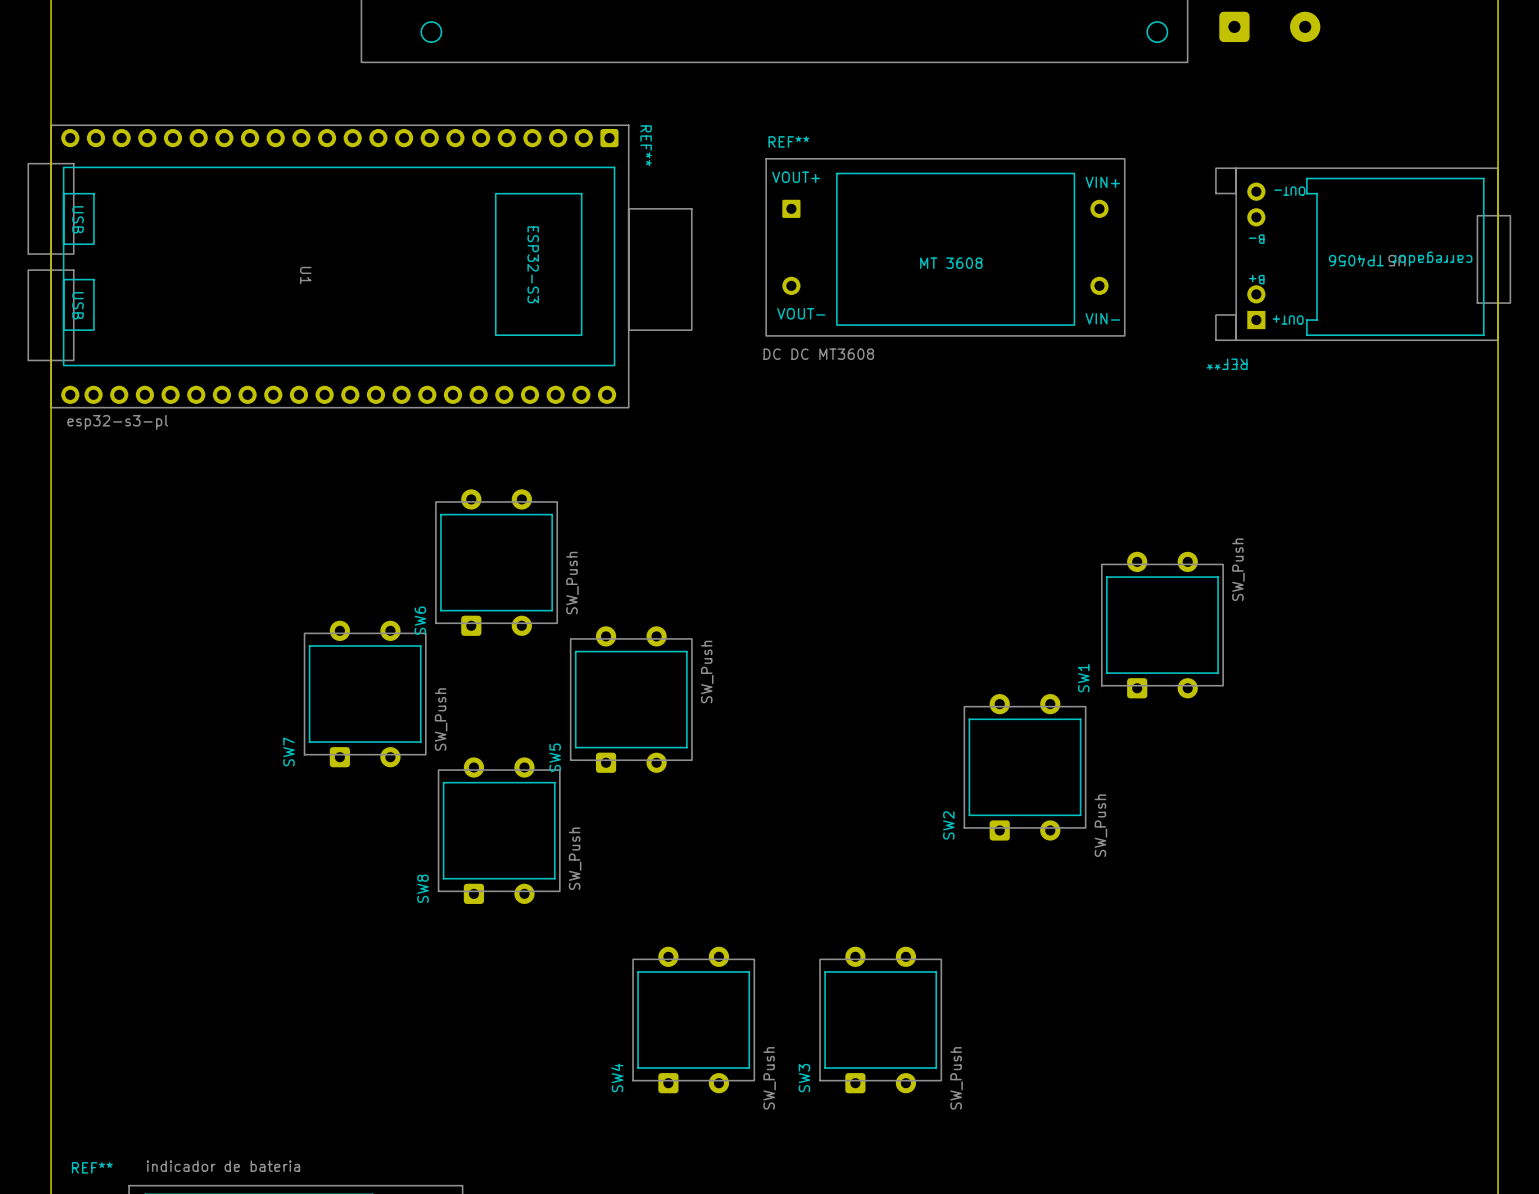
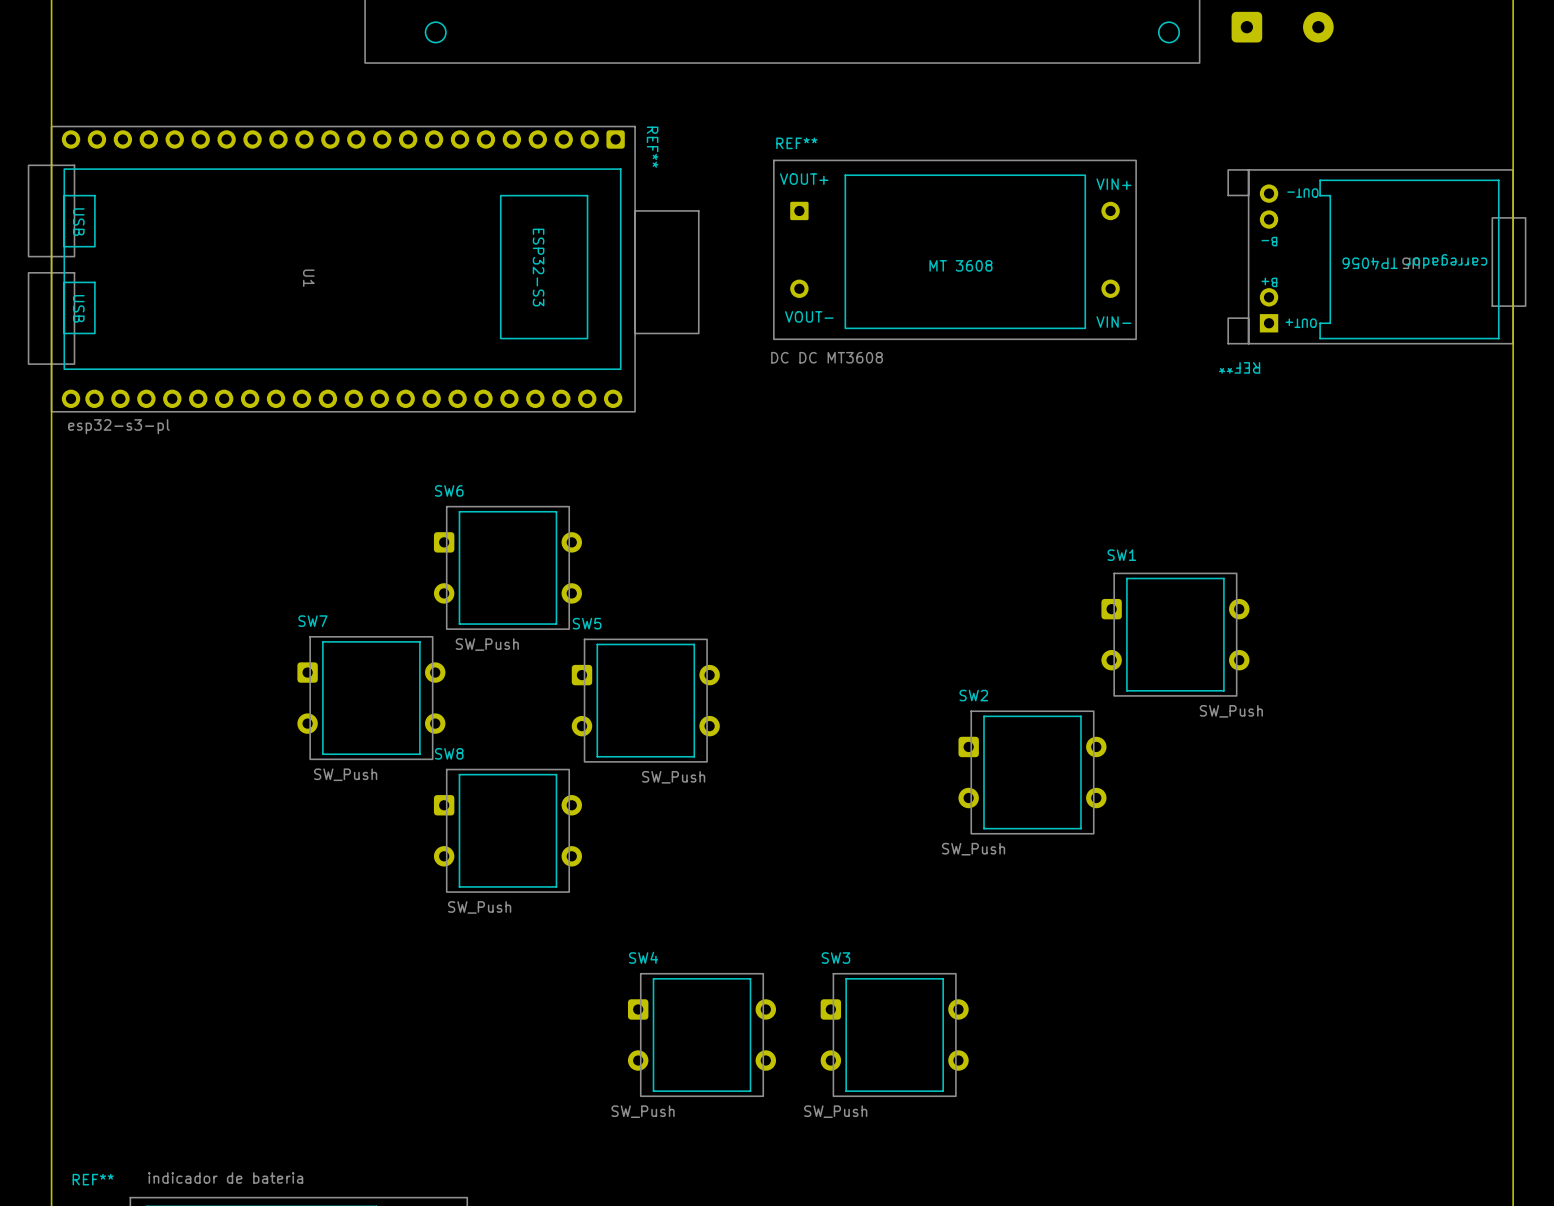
SW6 rotation: 0° (496, 562) -> 90° clockwise (507, 567)
SW1 rotation: 0° (1162, 625) -> 90° clockwise (1175, 634)
SW7 rotation: 0° (365, 694) -> 90° clockwise (371, 698)
SW5 rotation: 0° (631, 699) -> 90° clockwise (645, 700)
SW2 rotation: 0° (1025, 767) -> 90° clockwise (1032, 772)
SW8 rotation: 0° (499, 830) -> 90° clockwise (507, 830)
SW4 rotation: 0° (693, 1020) -> 90° clockwise (702, 1034)
SW3 rotation: 0° (880, 1020) -> 90° clockwise (894, 1034)

